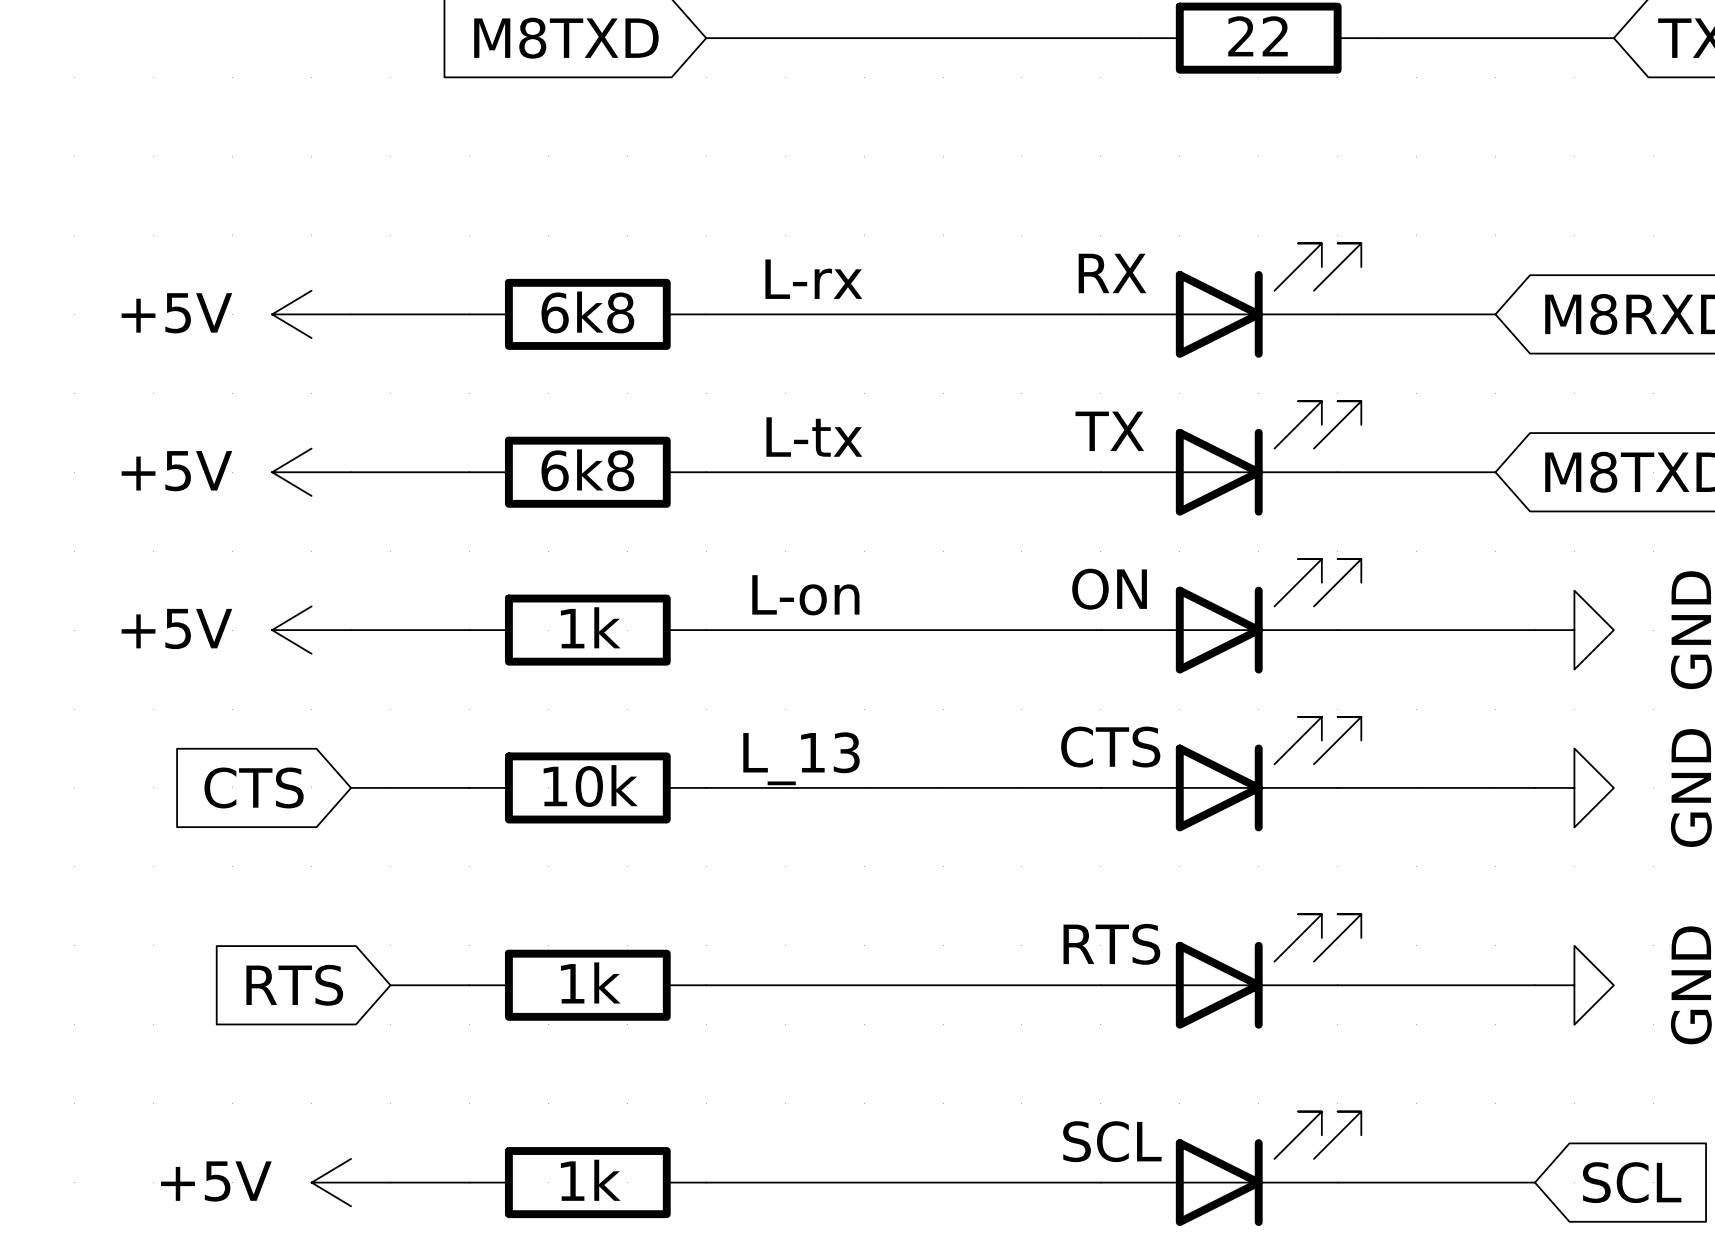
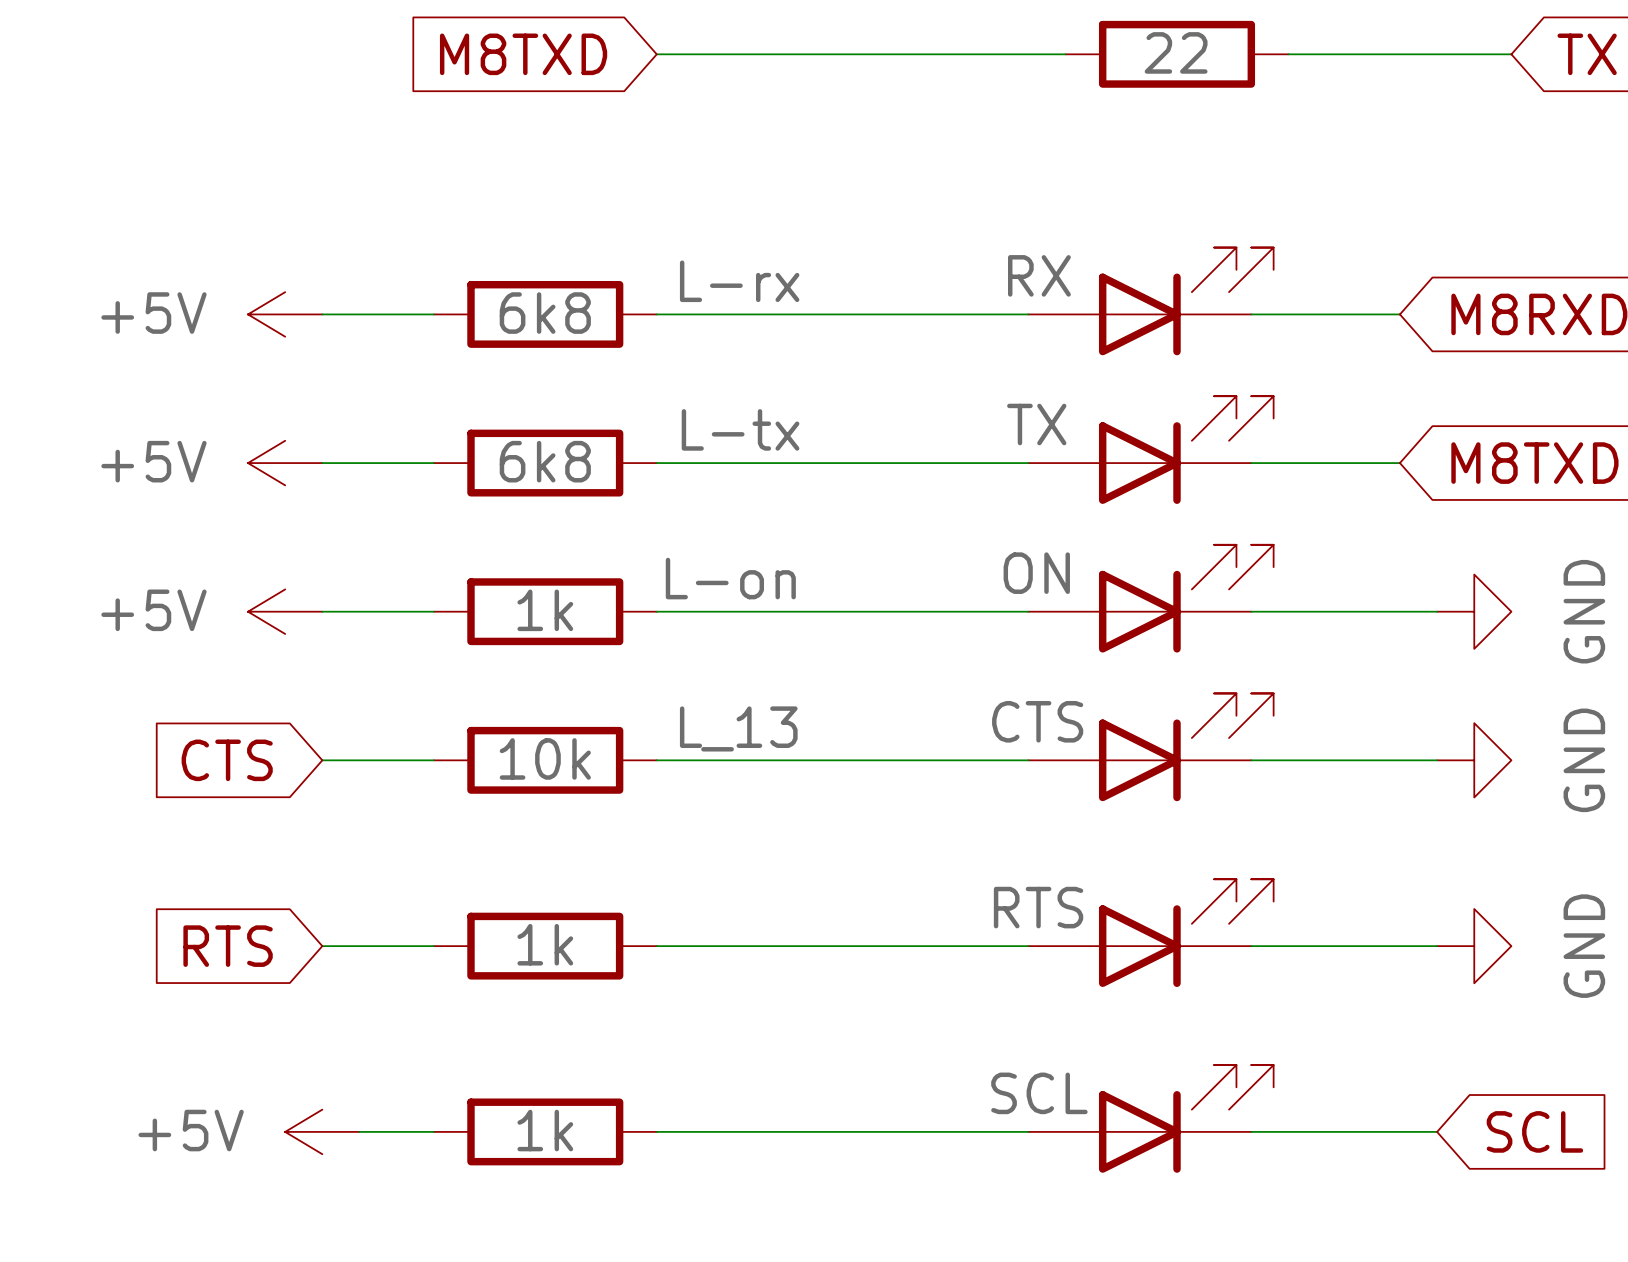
global label position: RTS (294, 985) -> RTS (228, 946)
wire: none -> (322, 946) (359, 946)

